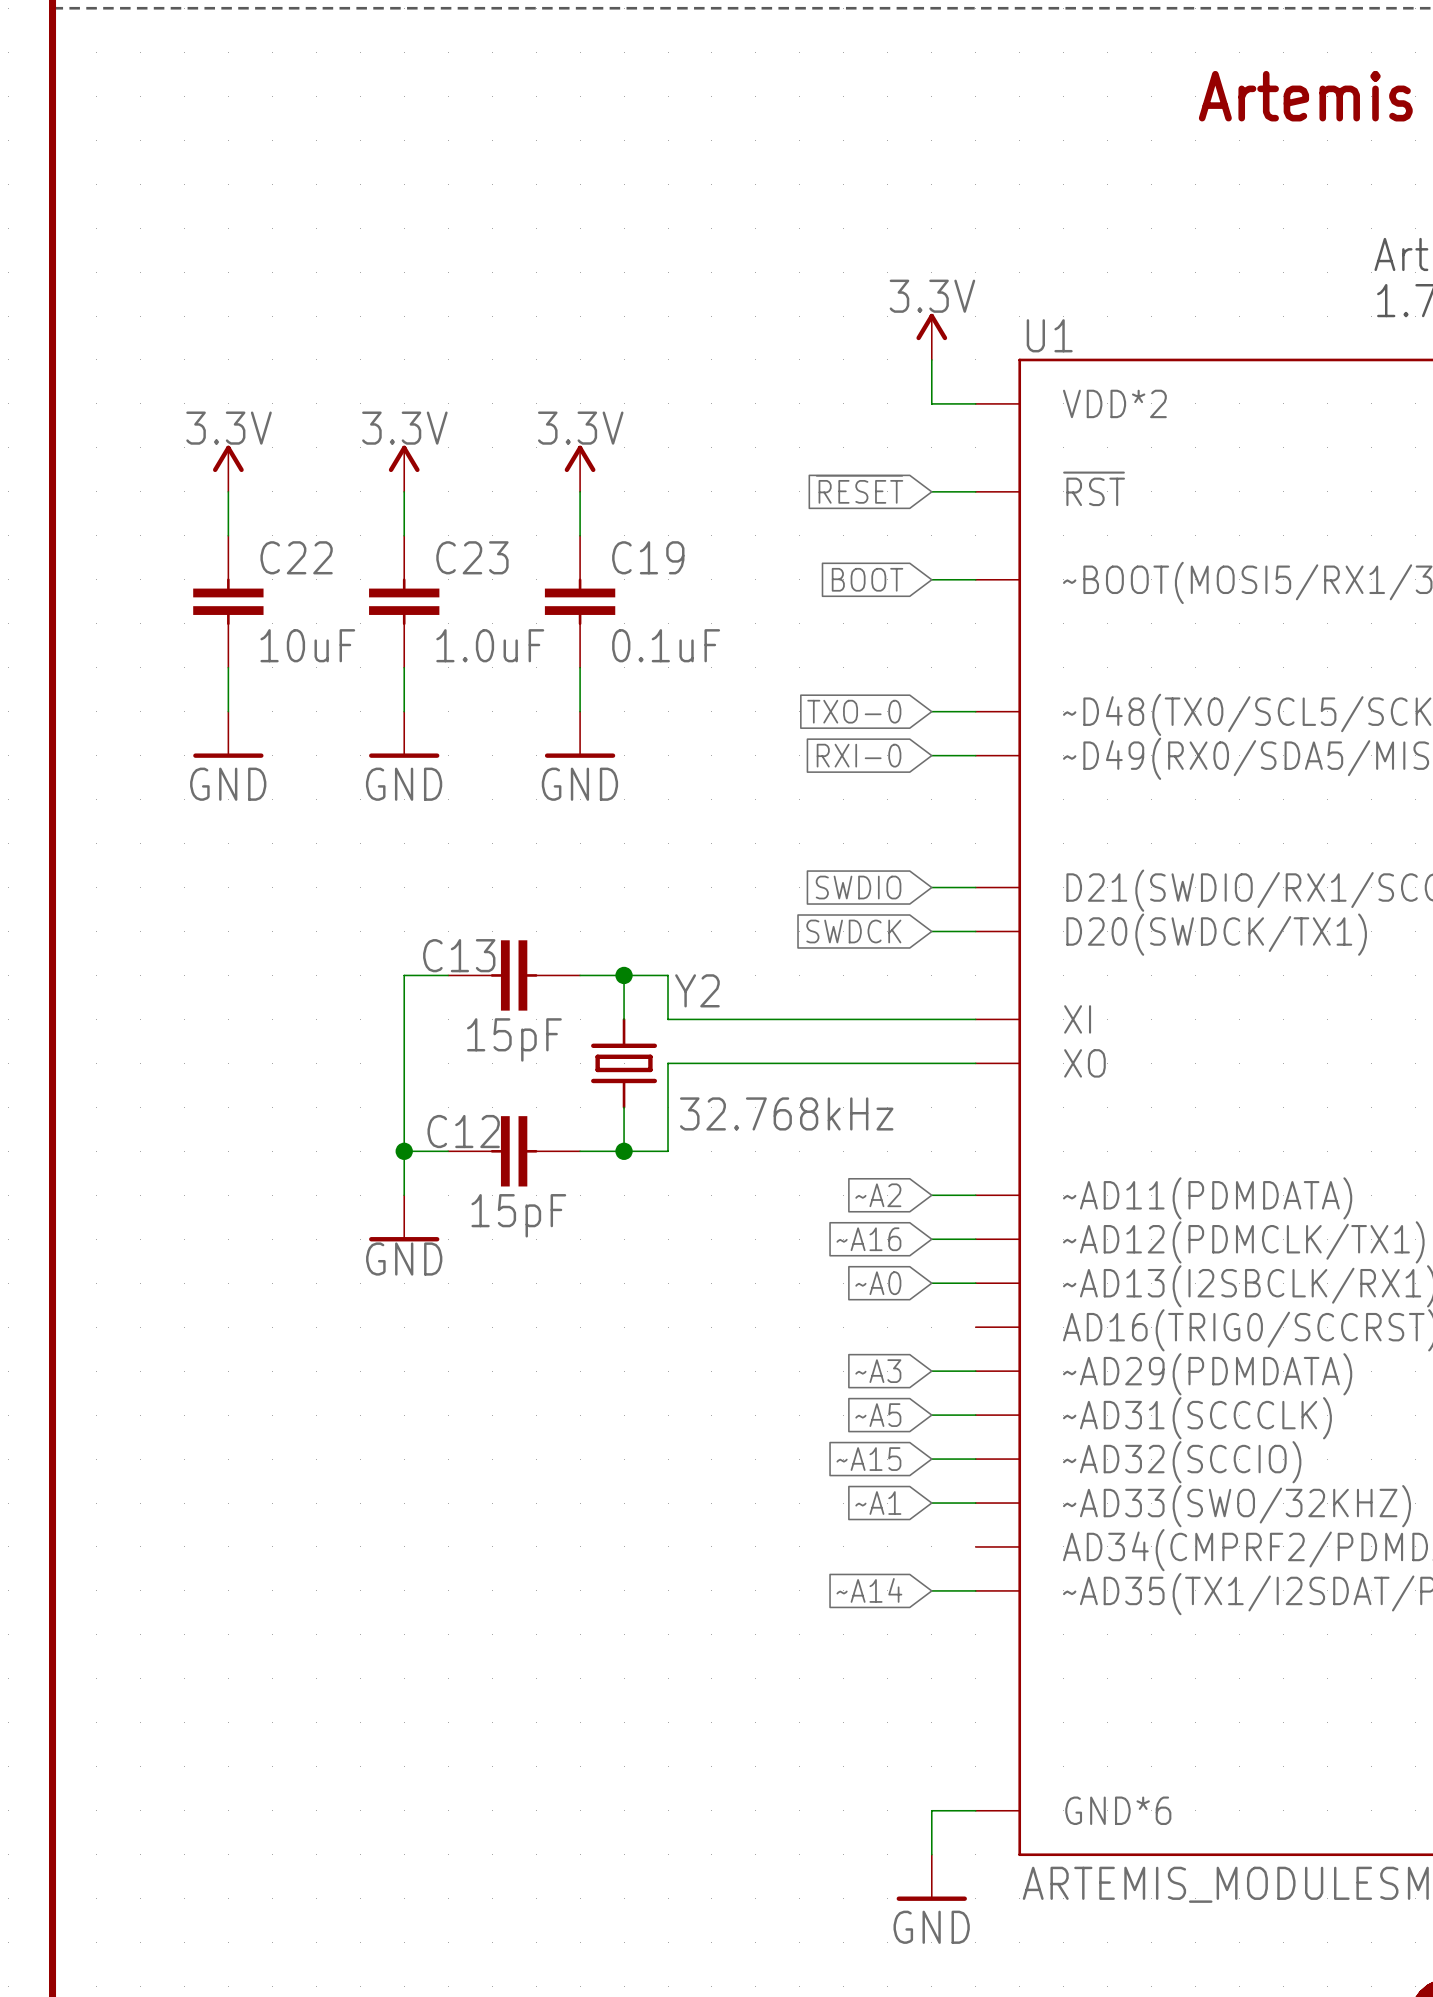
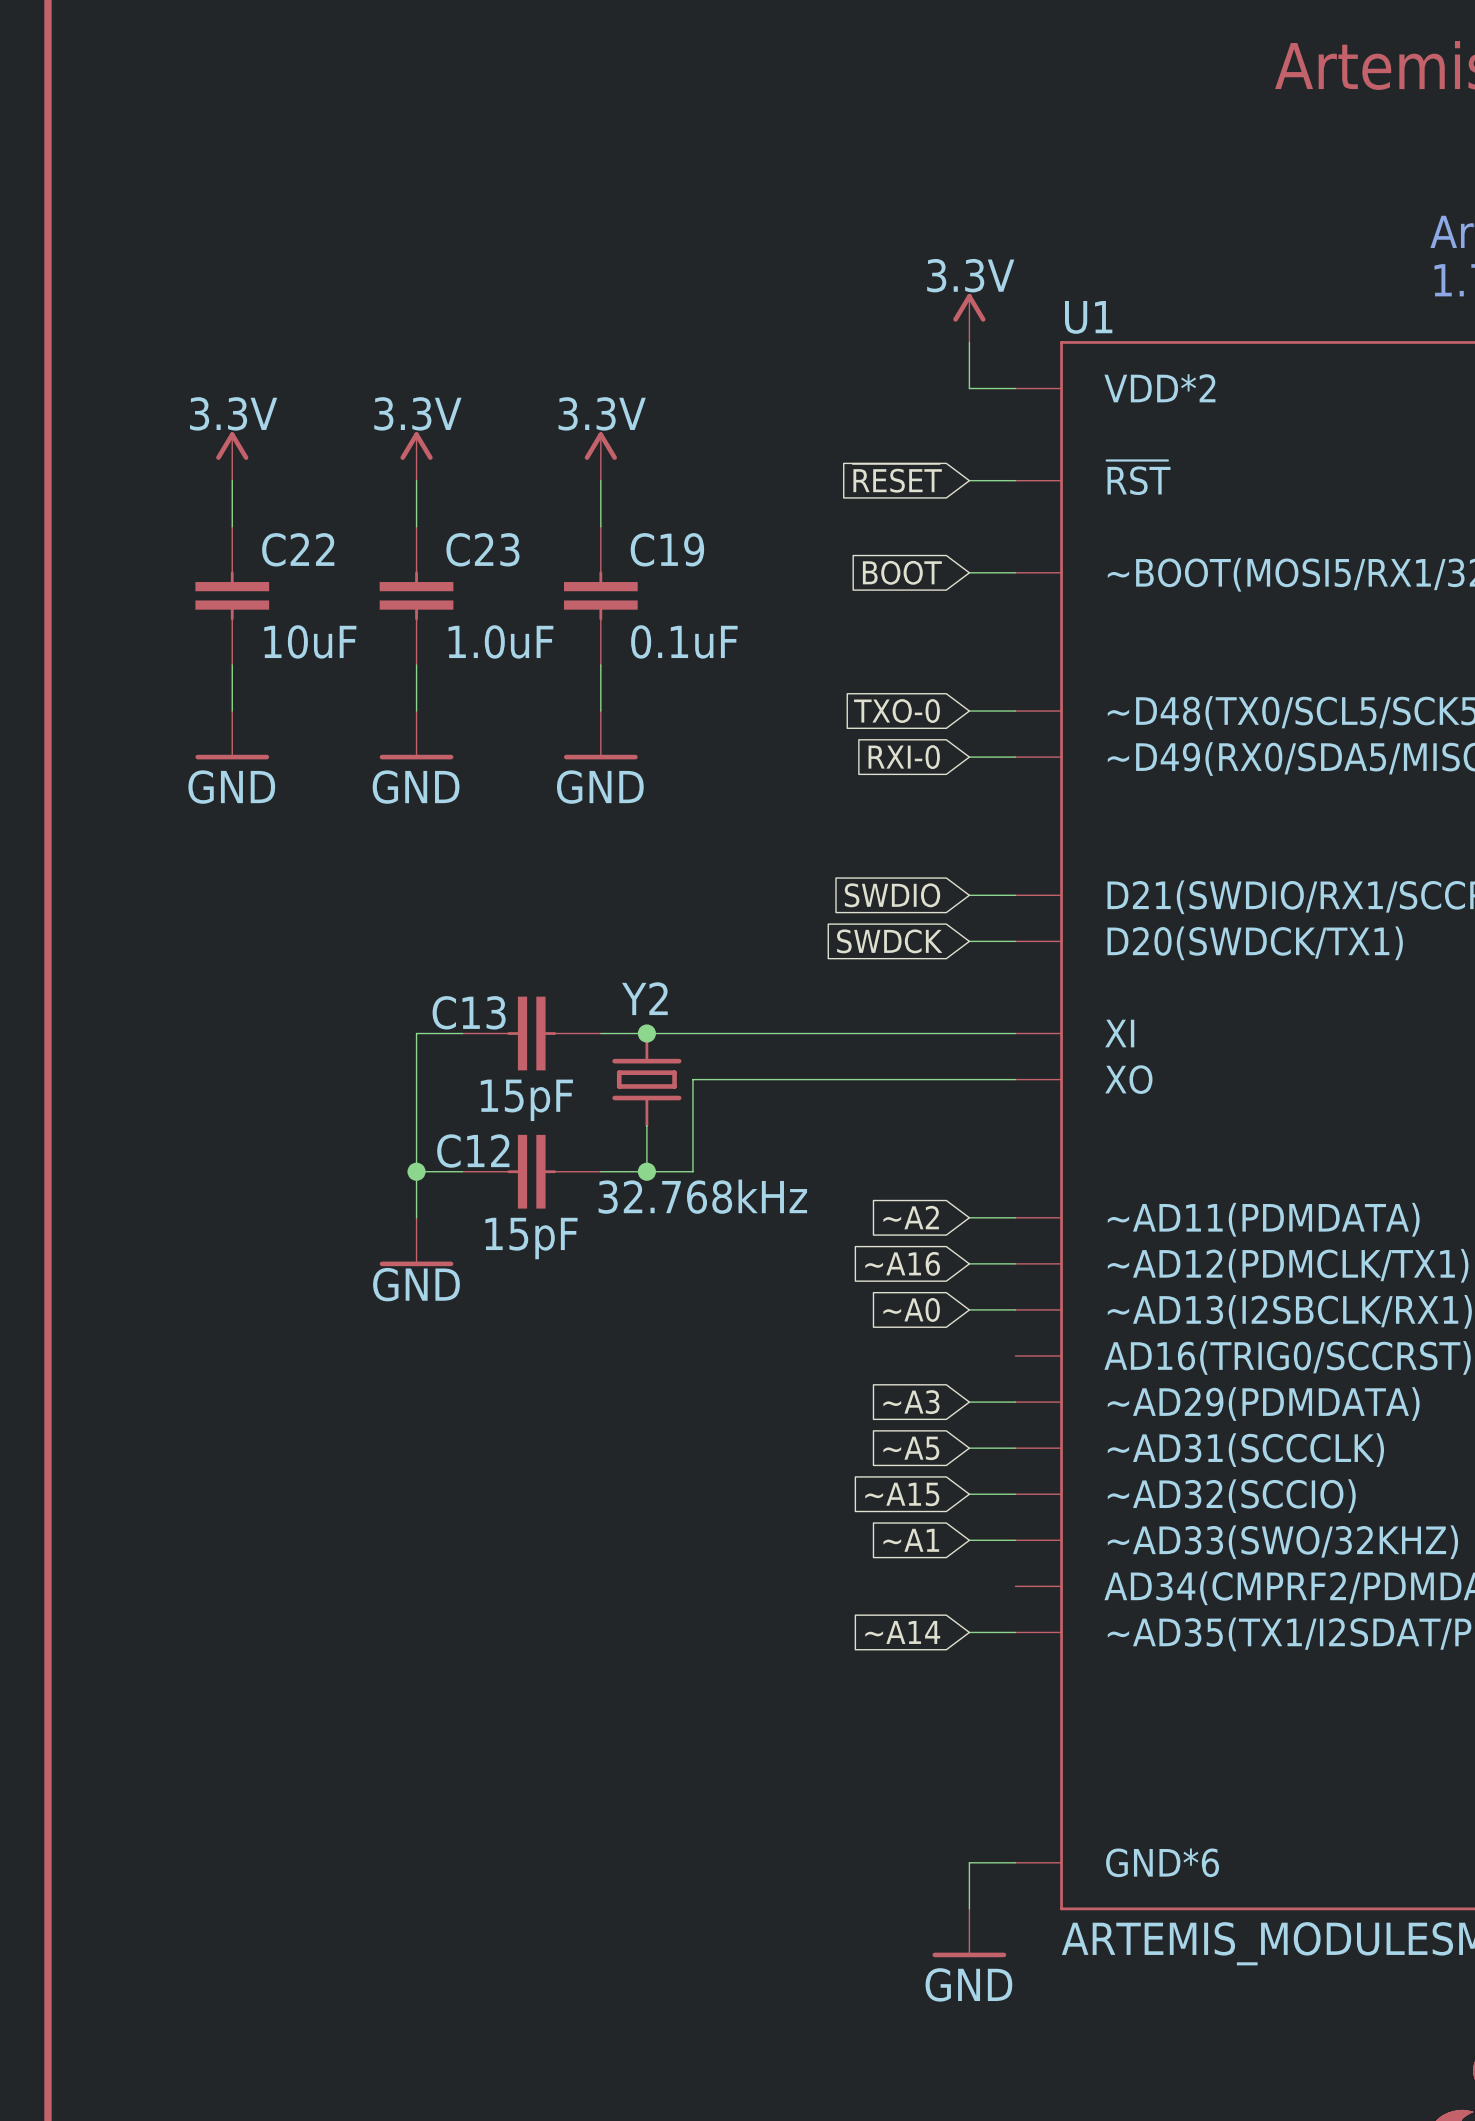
wire: (448, 975) (404, 975) (404, 1019) -> (462, 1033) (416, 1033)
C13 position: (514, 975) -> (531, 1033)
wire: (580, 975) (668, 975) (668, 1019) -> (600, 1033) (692, 1033)
wire: (624, 975) (624, 1019) -> none
junction position: (624, 975) -> (646, 1033)
Y2 name position: Y2 (697, 990) -> Y2 (644, 998)
Y2 value position: 32.768kHz (786, 1113) -> 32.768kHz (702, 1196)

